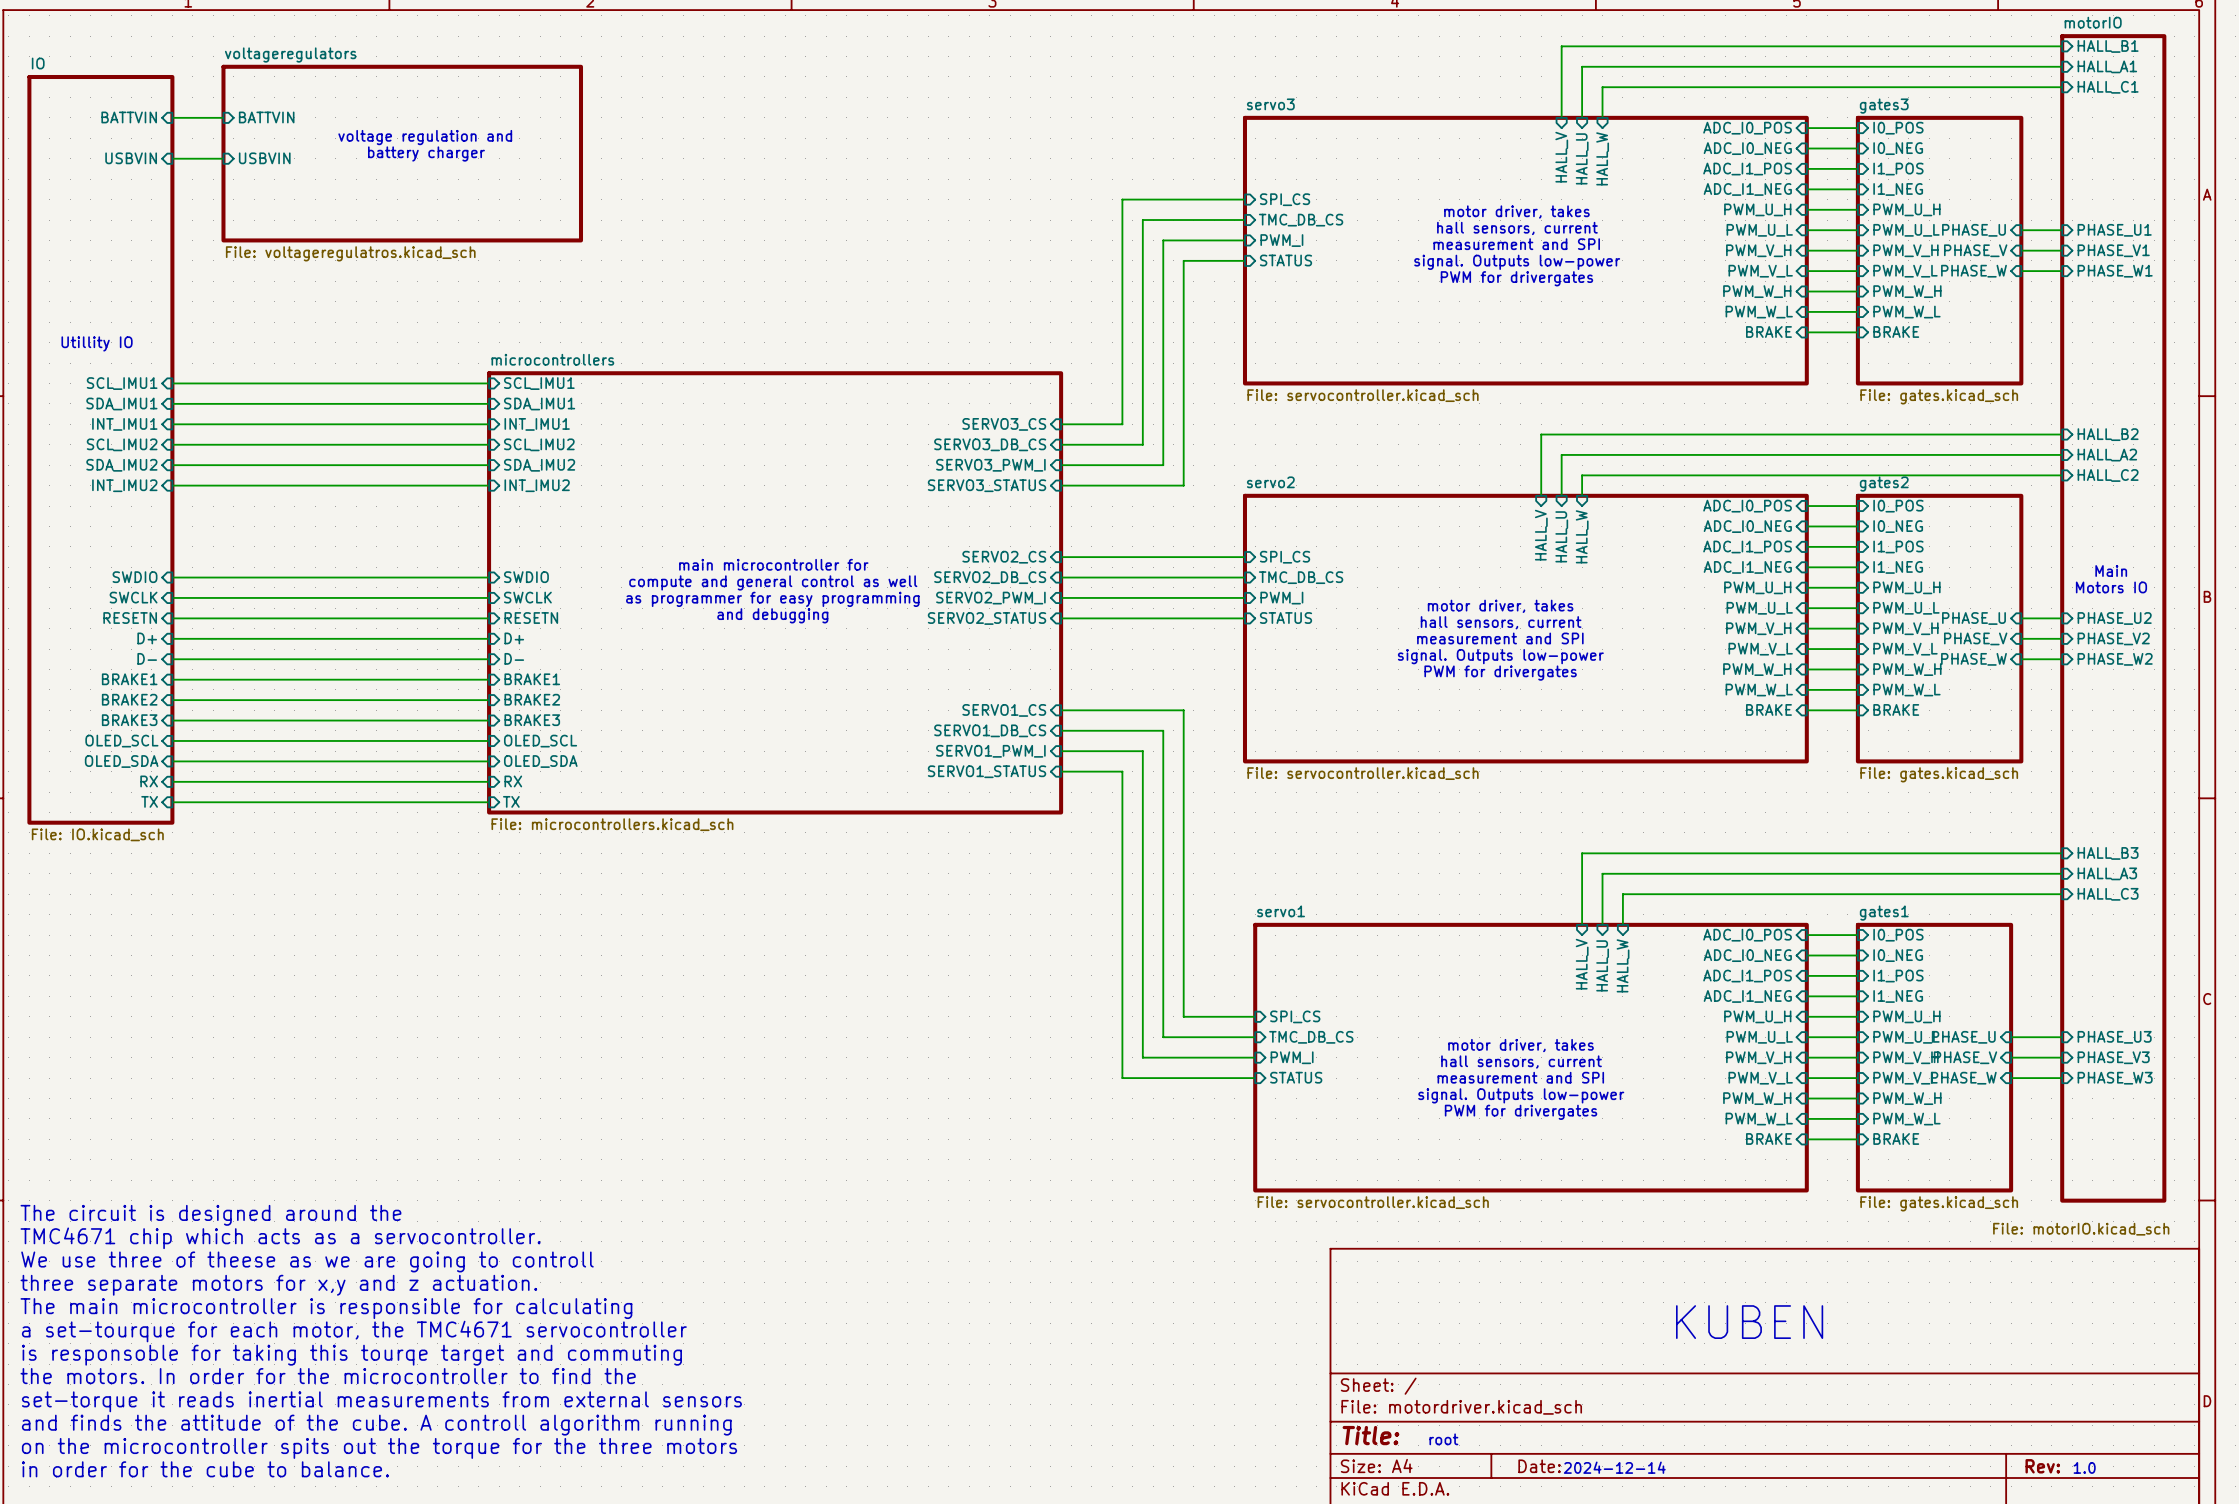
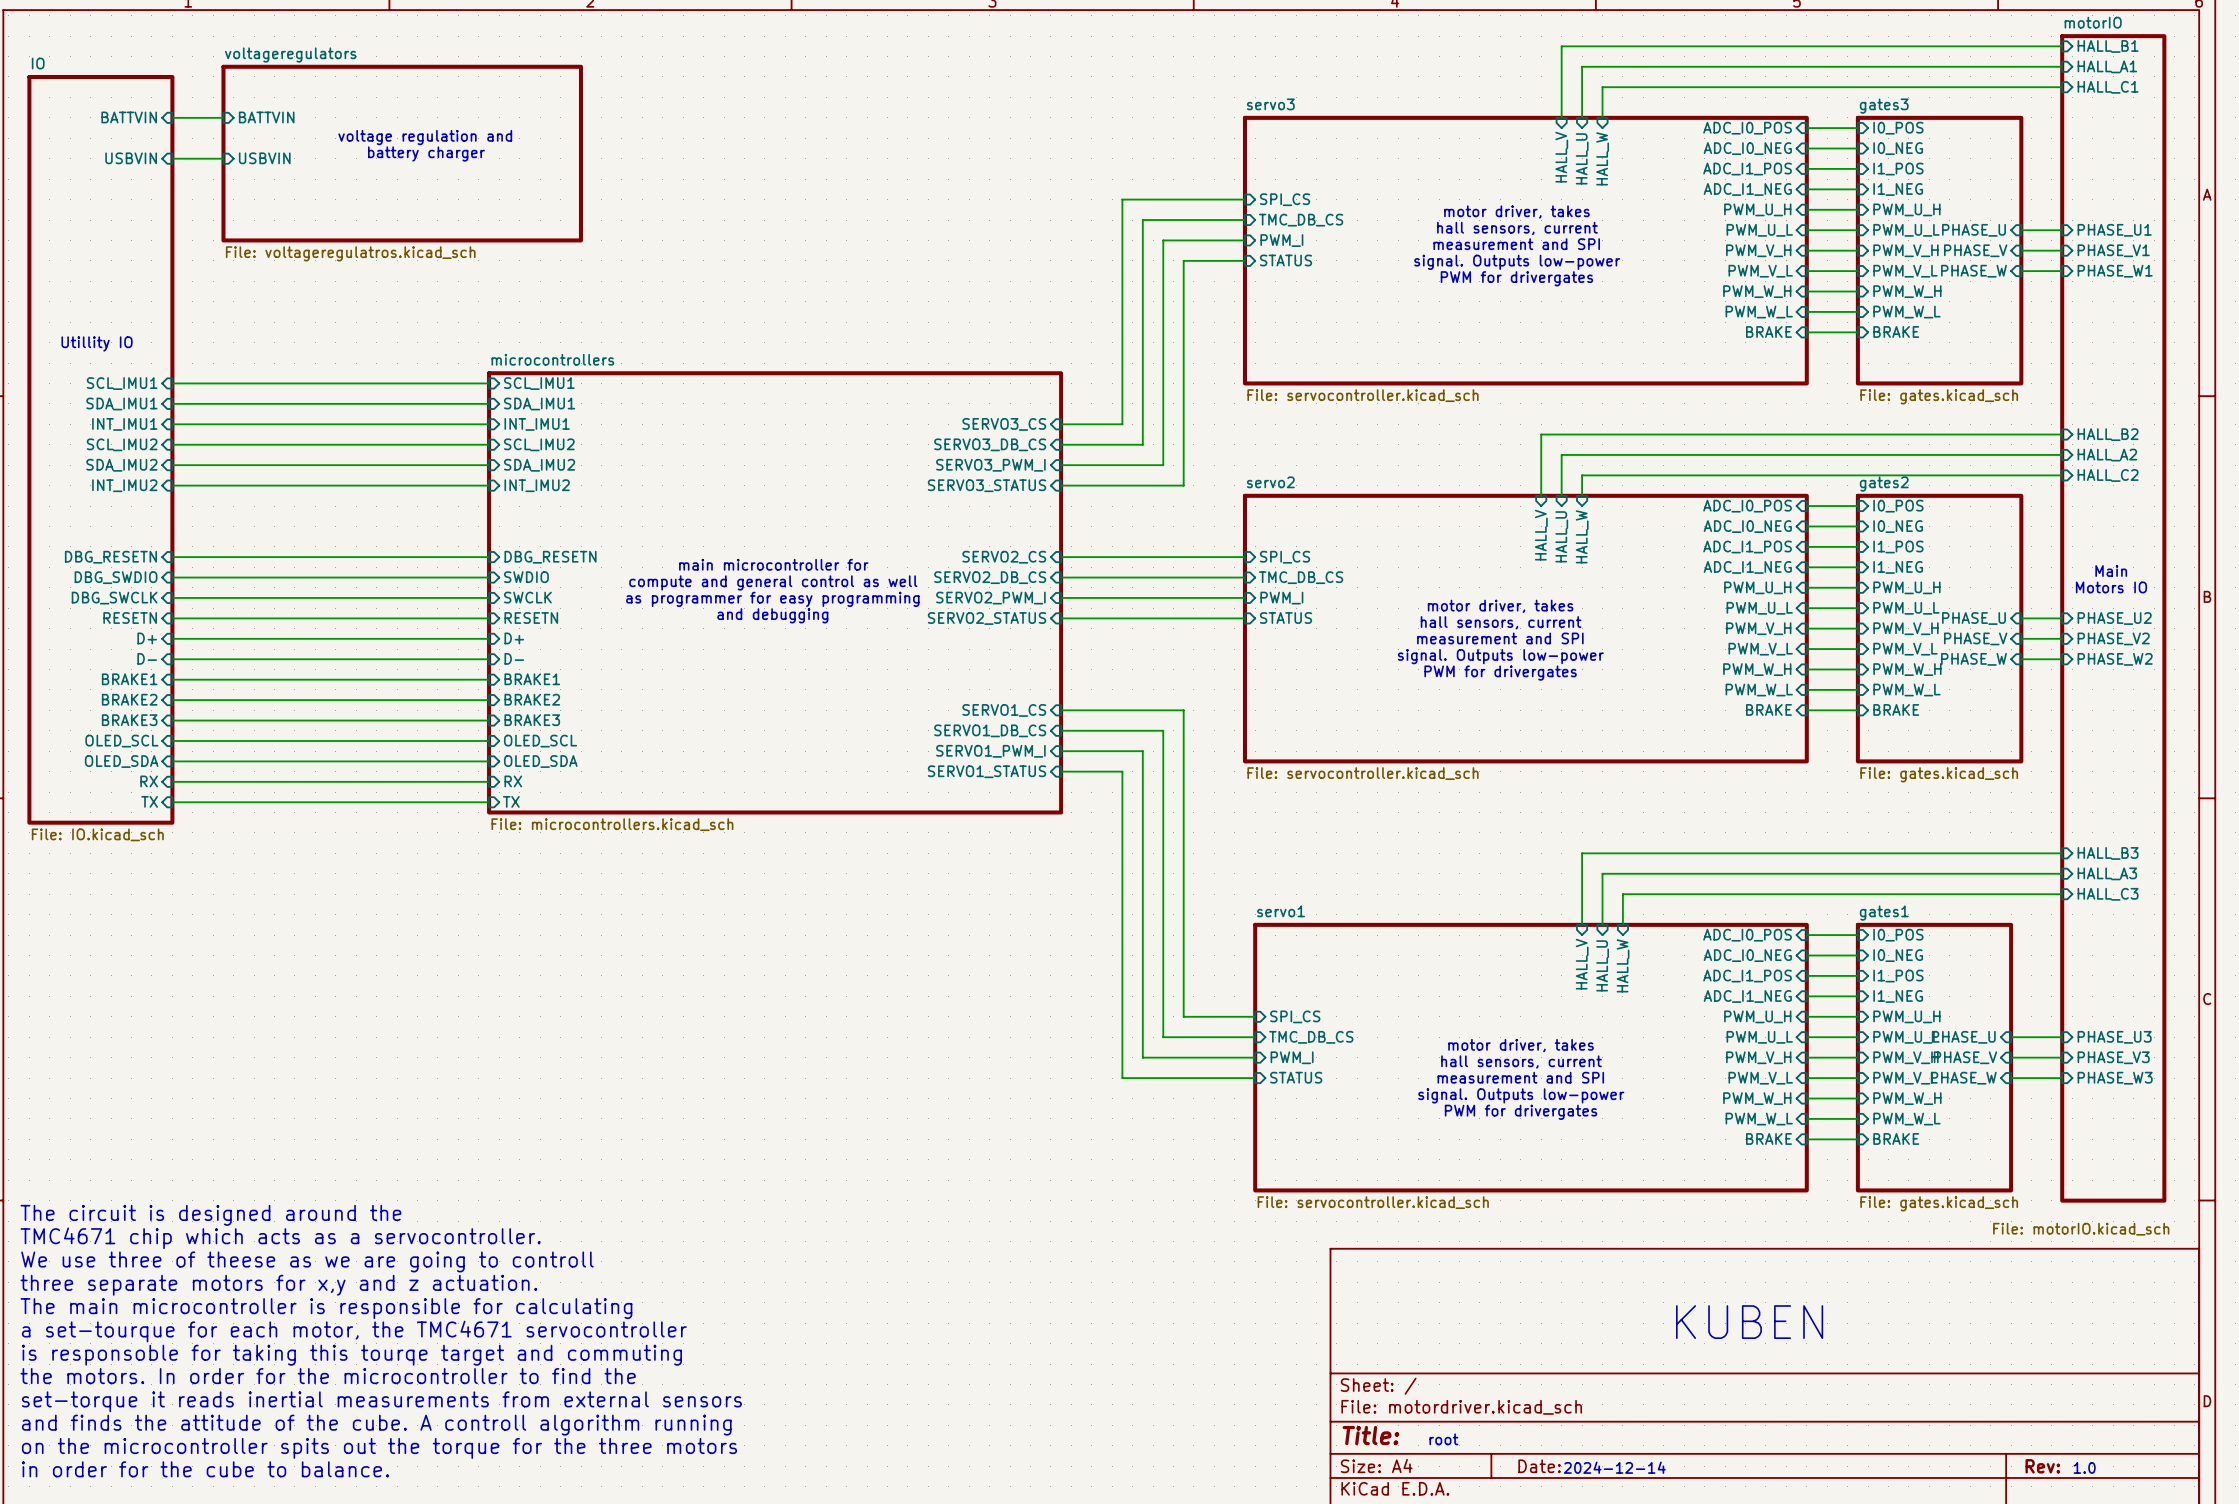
sheet pin: none -> DBG_RESETN (110, 557)
wire: none -> (172, 557) (489, 557)
sheet pin: none -> DBG_RESETN (550, 557)
sheet pin: SWDIO (135, 577) -> DBG_SWDIO (116, 577)
sheet pin: SWCLK (133, 597) -> DBG_SWCLK (114, 598)

